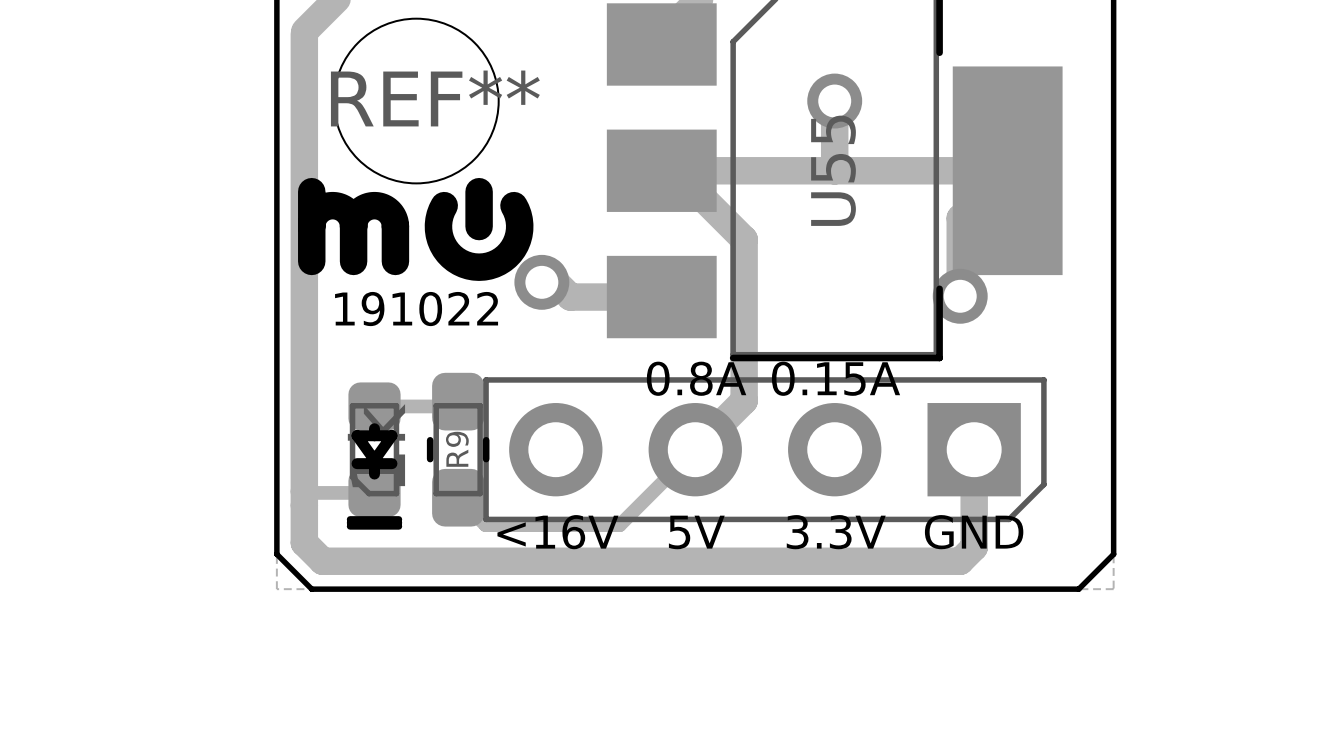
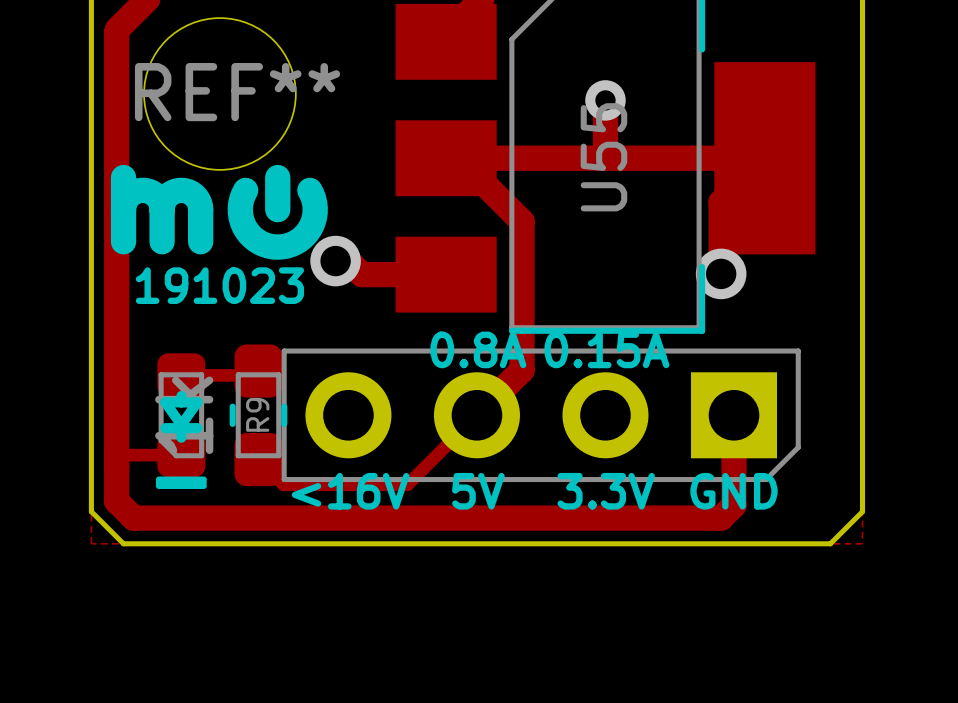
via size: [807, 73, 863, 129] -> [585, 80, 626, 121]
text: 191022 (416, 309) -> 191023 (219, 285)

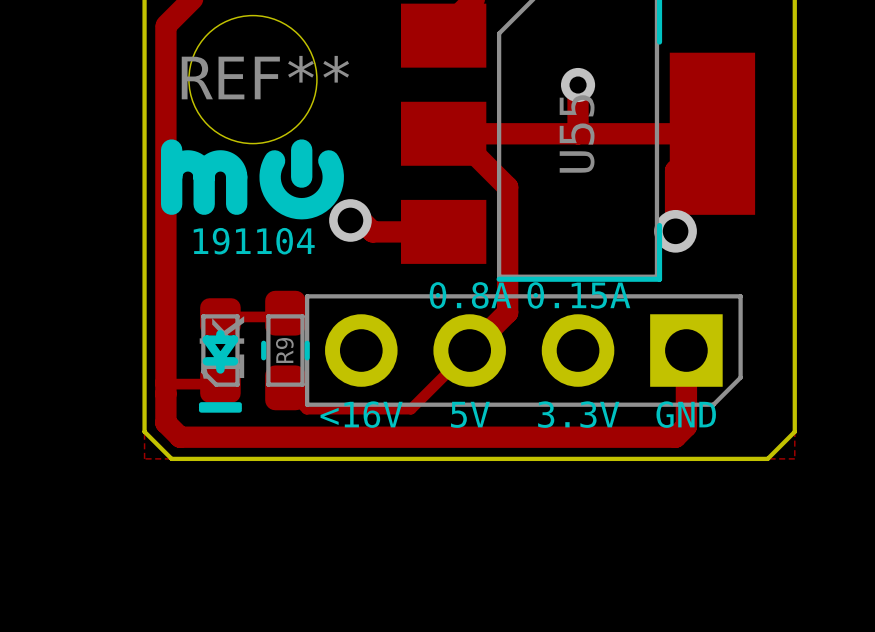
text: 191023 (219, 285) -> 191104 (254, 241)

